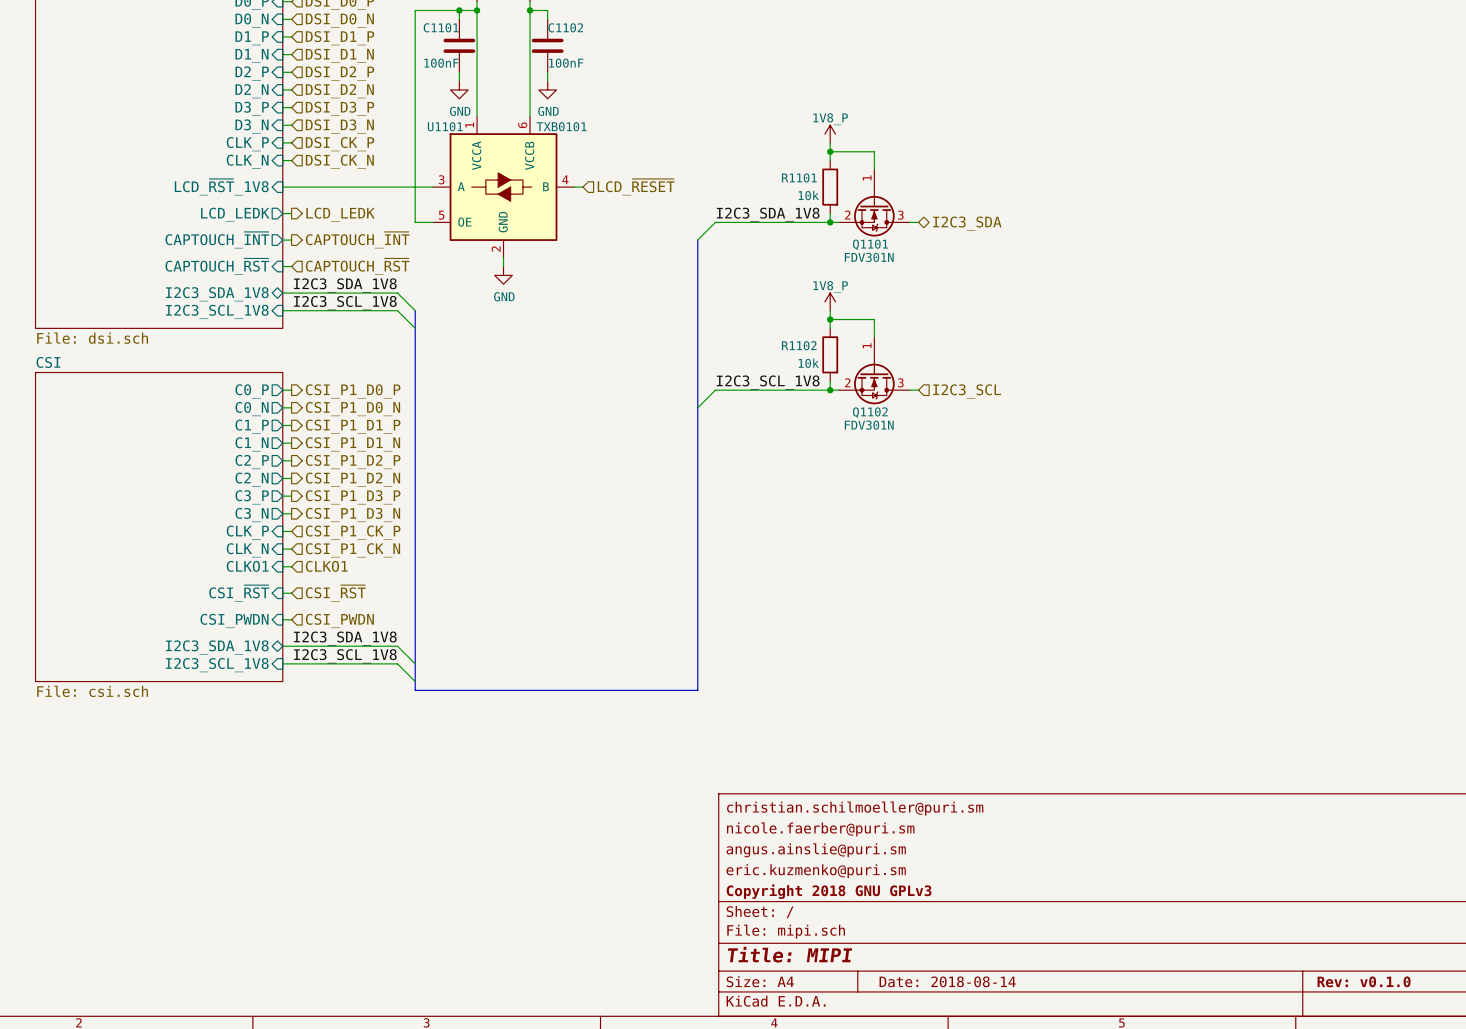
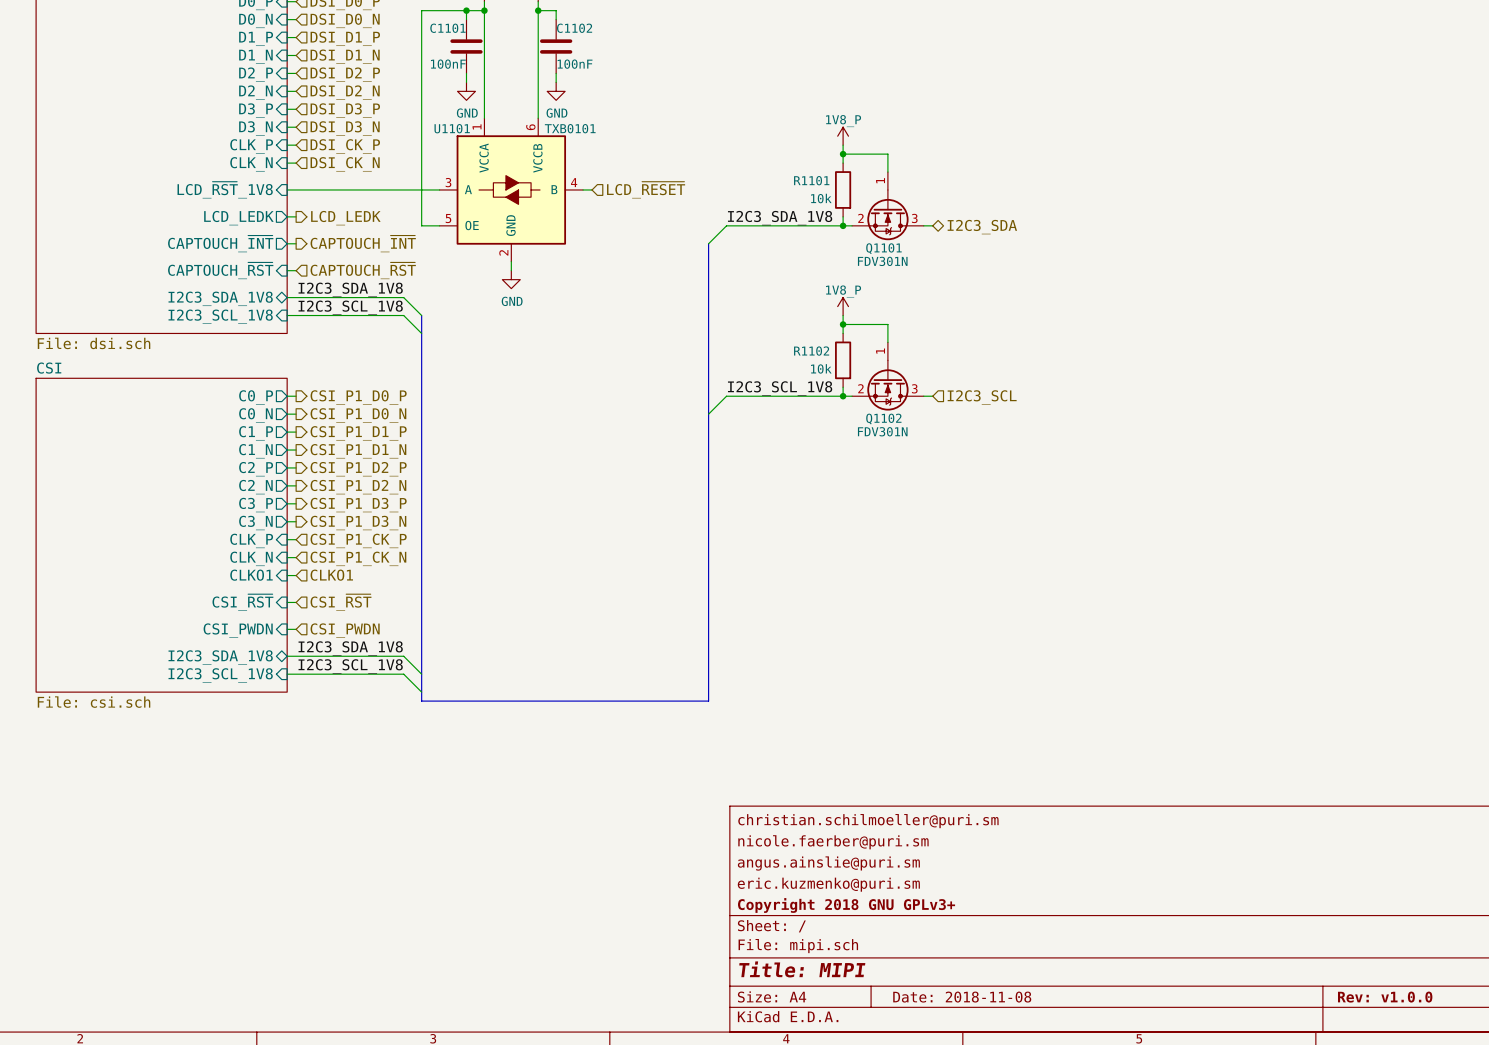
title block: Copyright 2018 GNU GPLv3 (829, 891) -> Copyright 2018 GNU GPLv3+ (846, 905)
title block: Date: 2018-08-14 (947, 981) -> Date: 2018-11-08 (962, 997)
title block: Rev: v0.1.0 (1364, 981) -> Rev: v1.0.0 (1385, 997)

